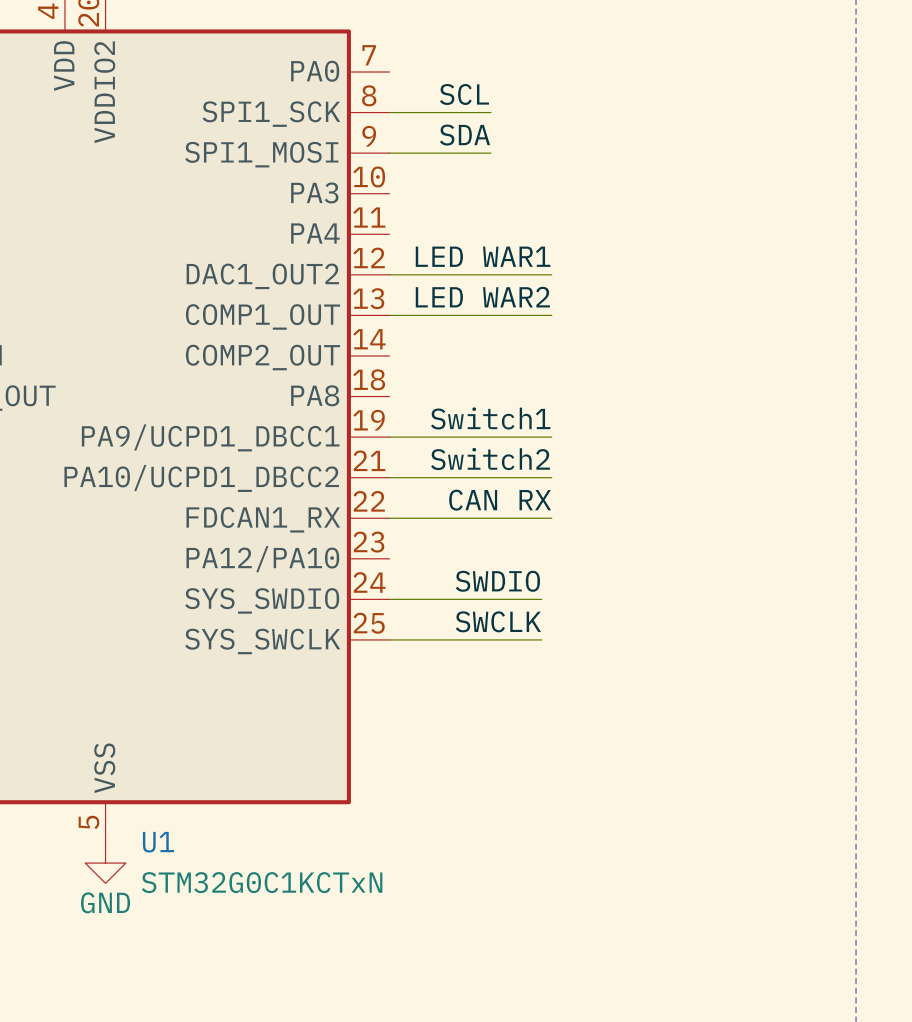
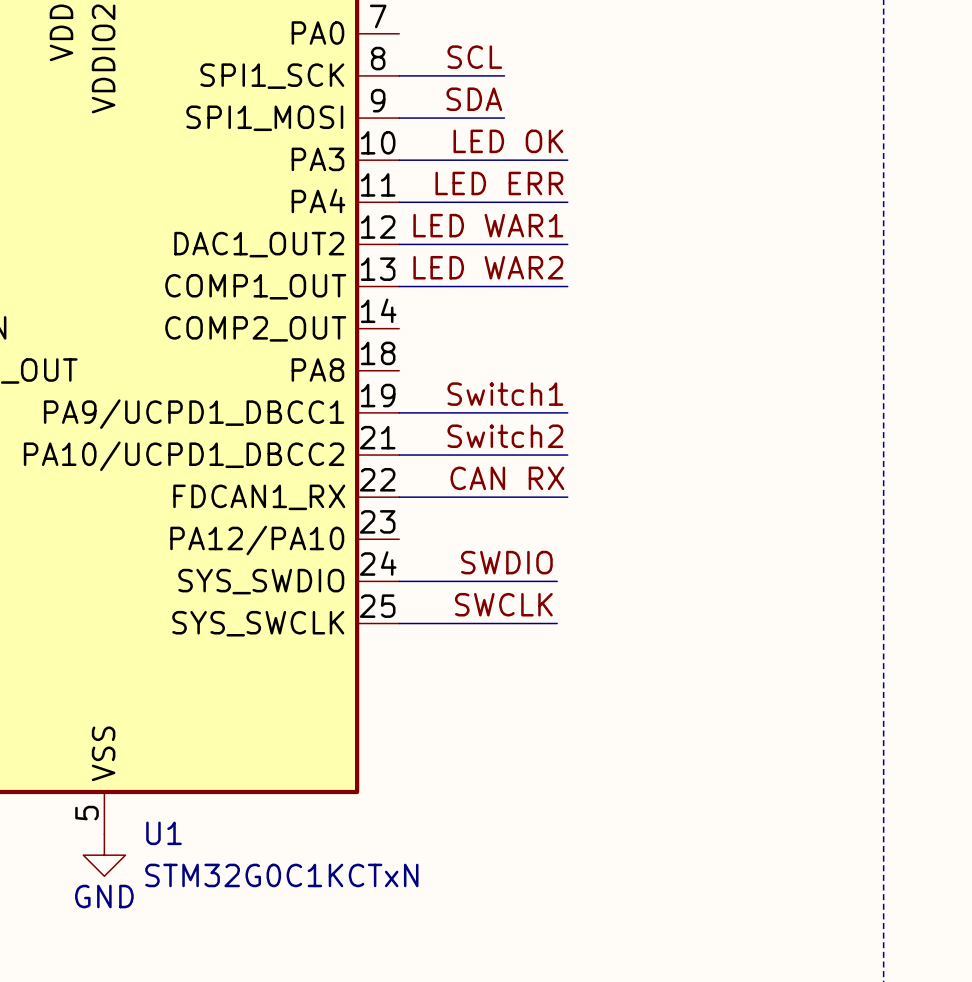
label: none -> LED OK (508, 141)
wire: none -> (399, 160) (567, 160)
label: none -> LED ERR (499, 183)
wire: none -> (399, 202) (567, 202)

